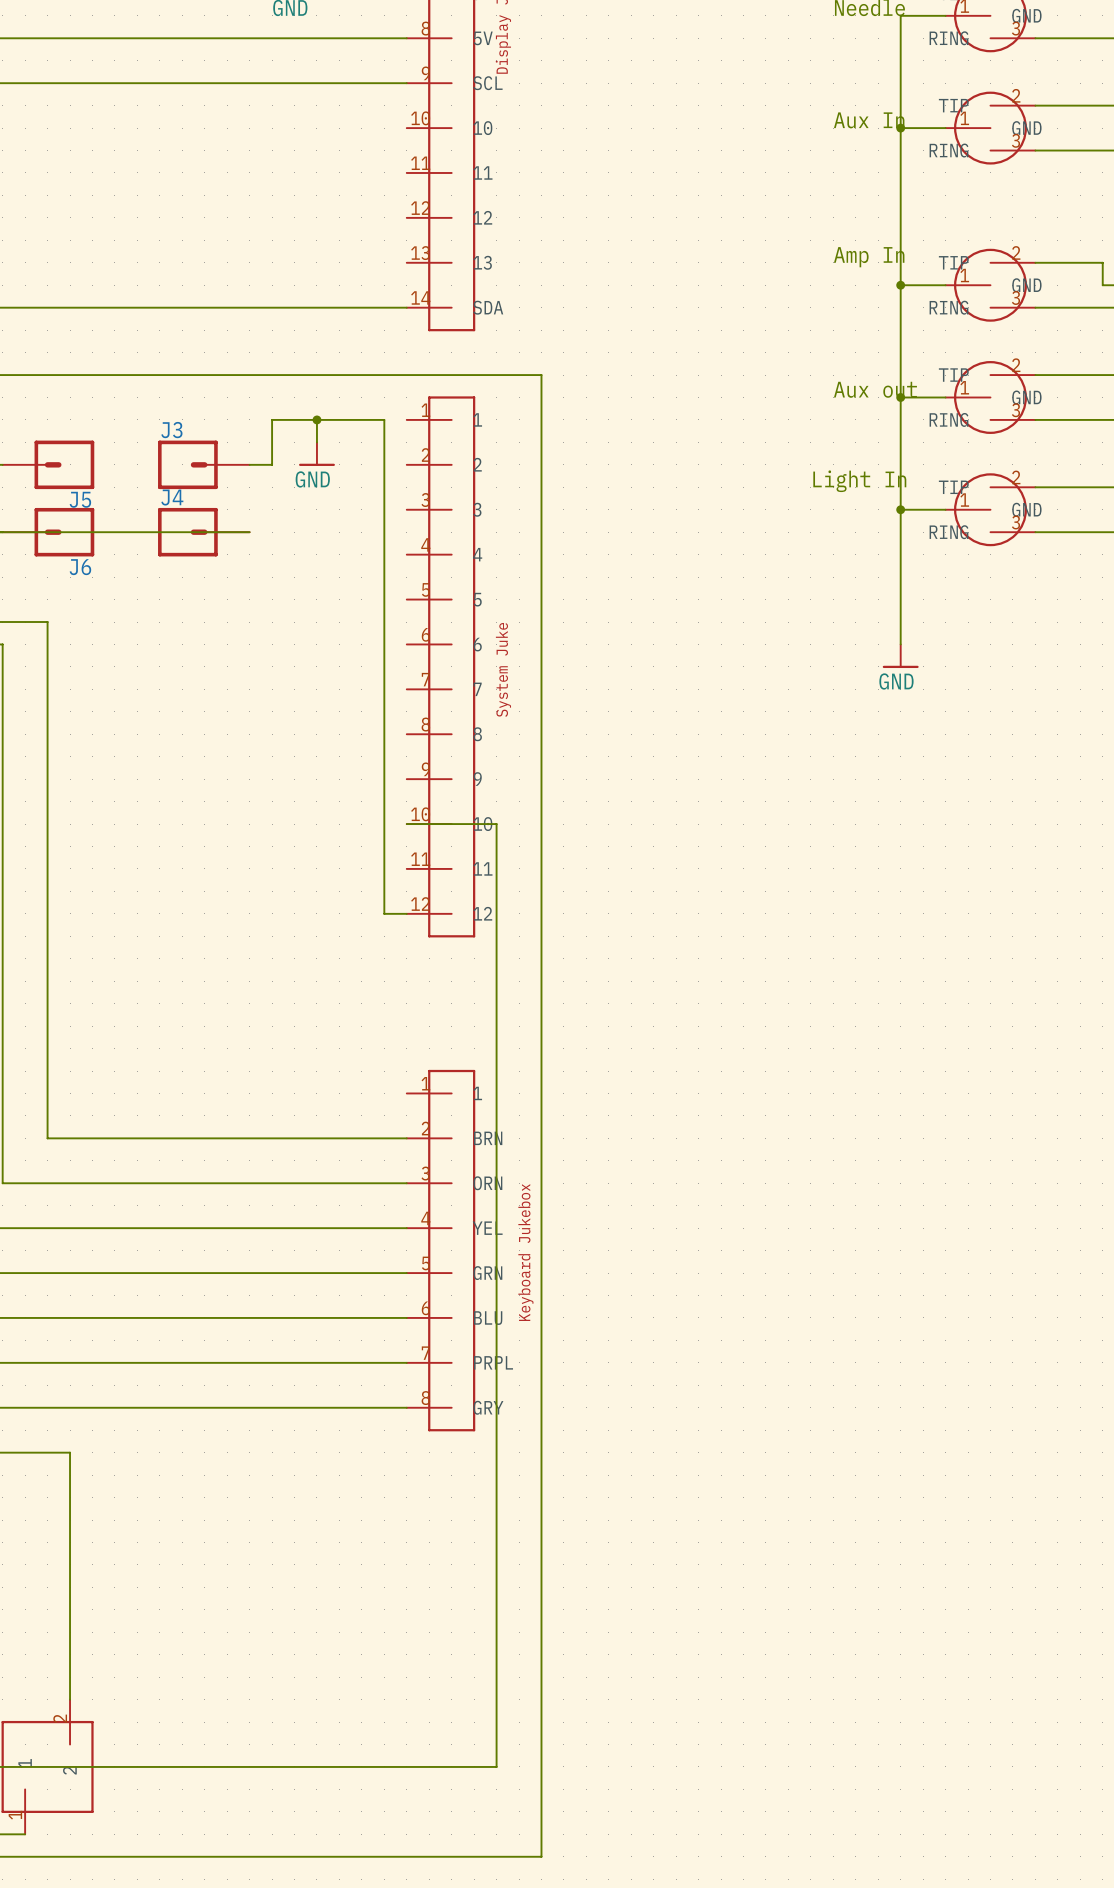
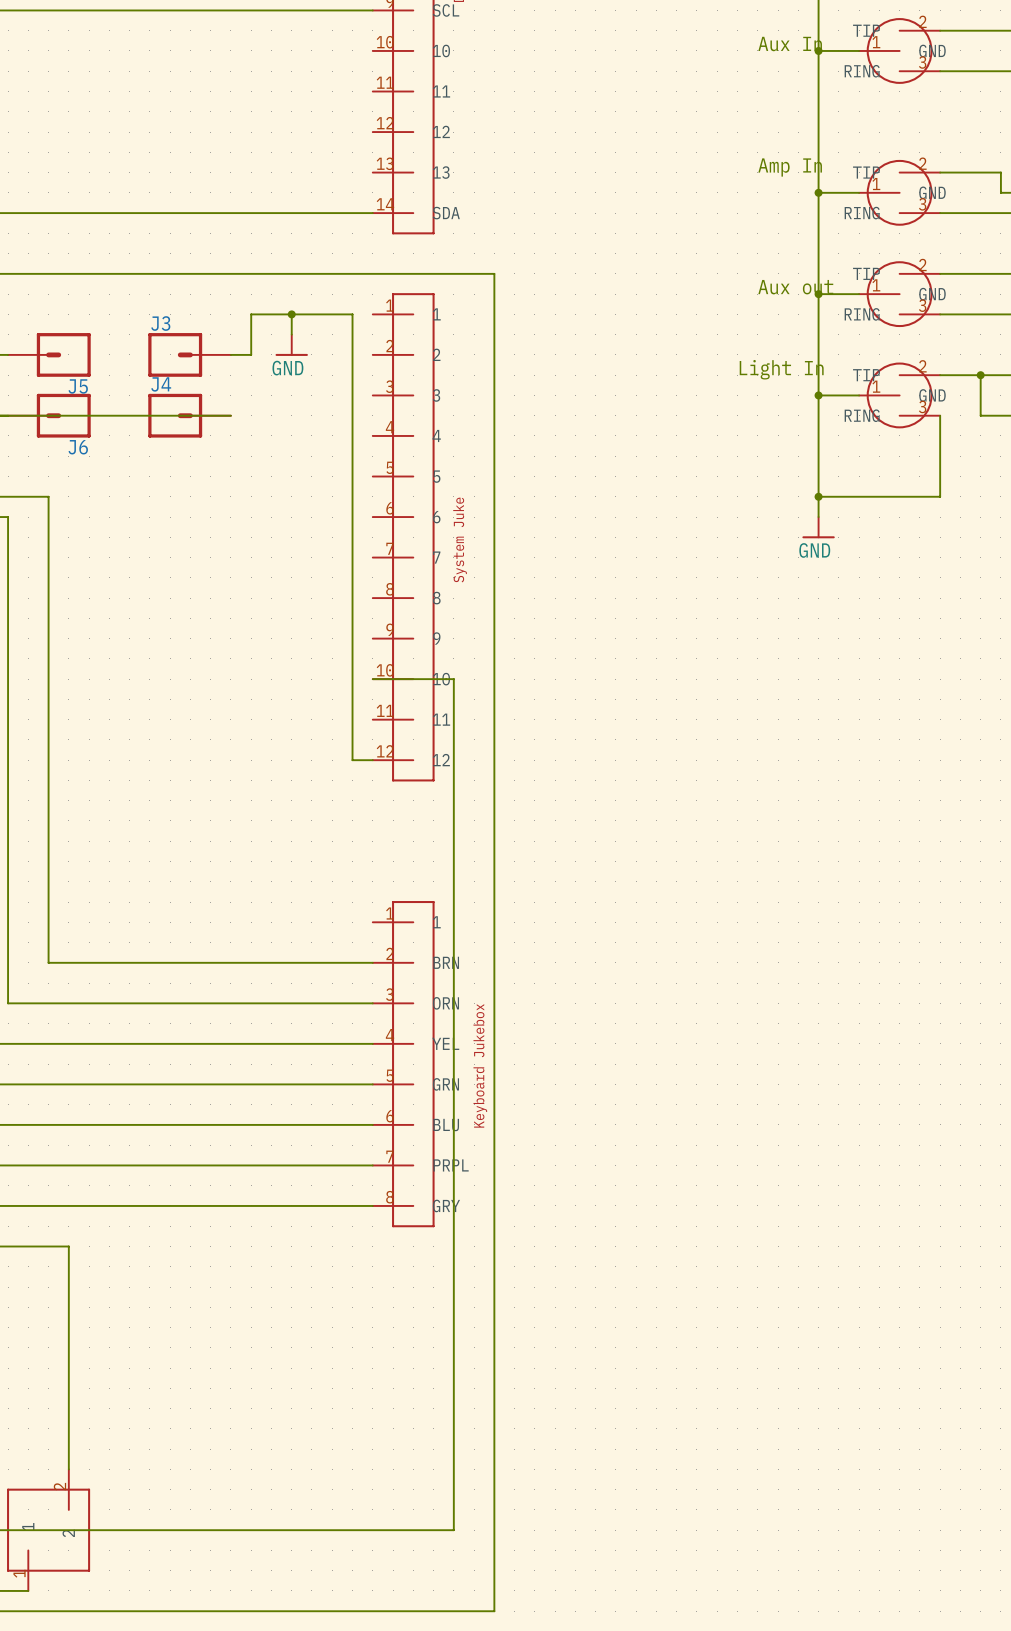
junction: none -> (980, 375)
wire: (1035, 532) (1080, 532) -> (980, 375) (980, 415)
wire: none -> (940, 415) (940, 496) (818, 496)
junction: none -> (818, 496)

